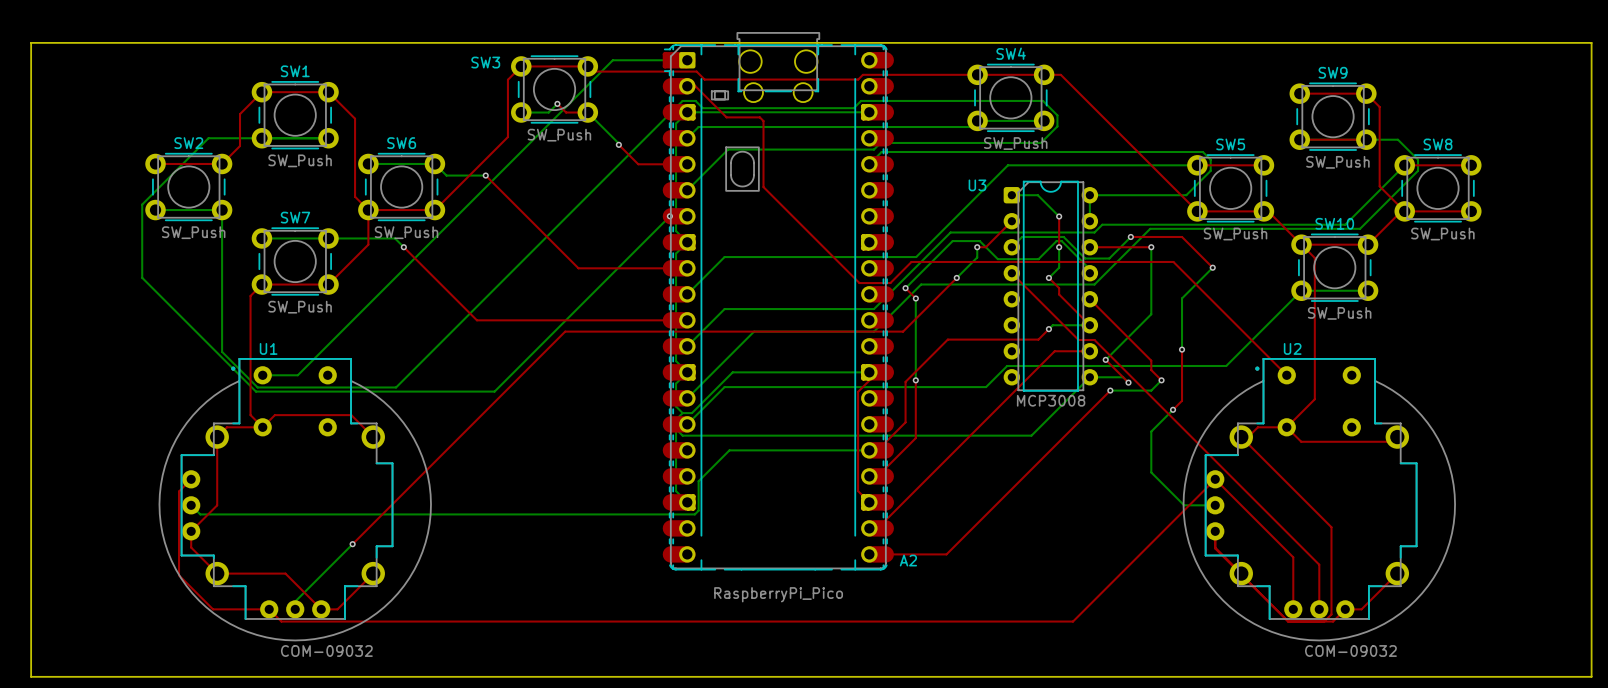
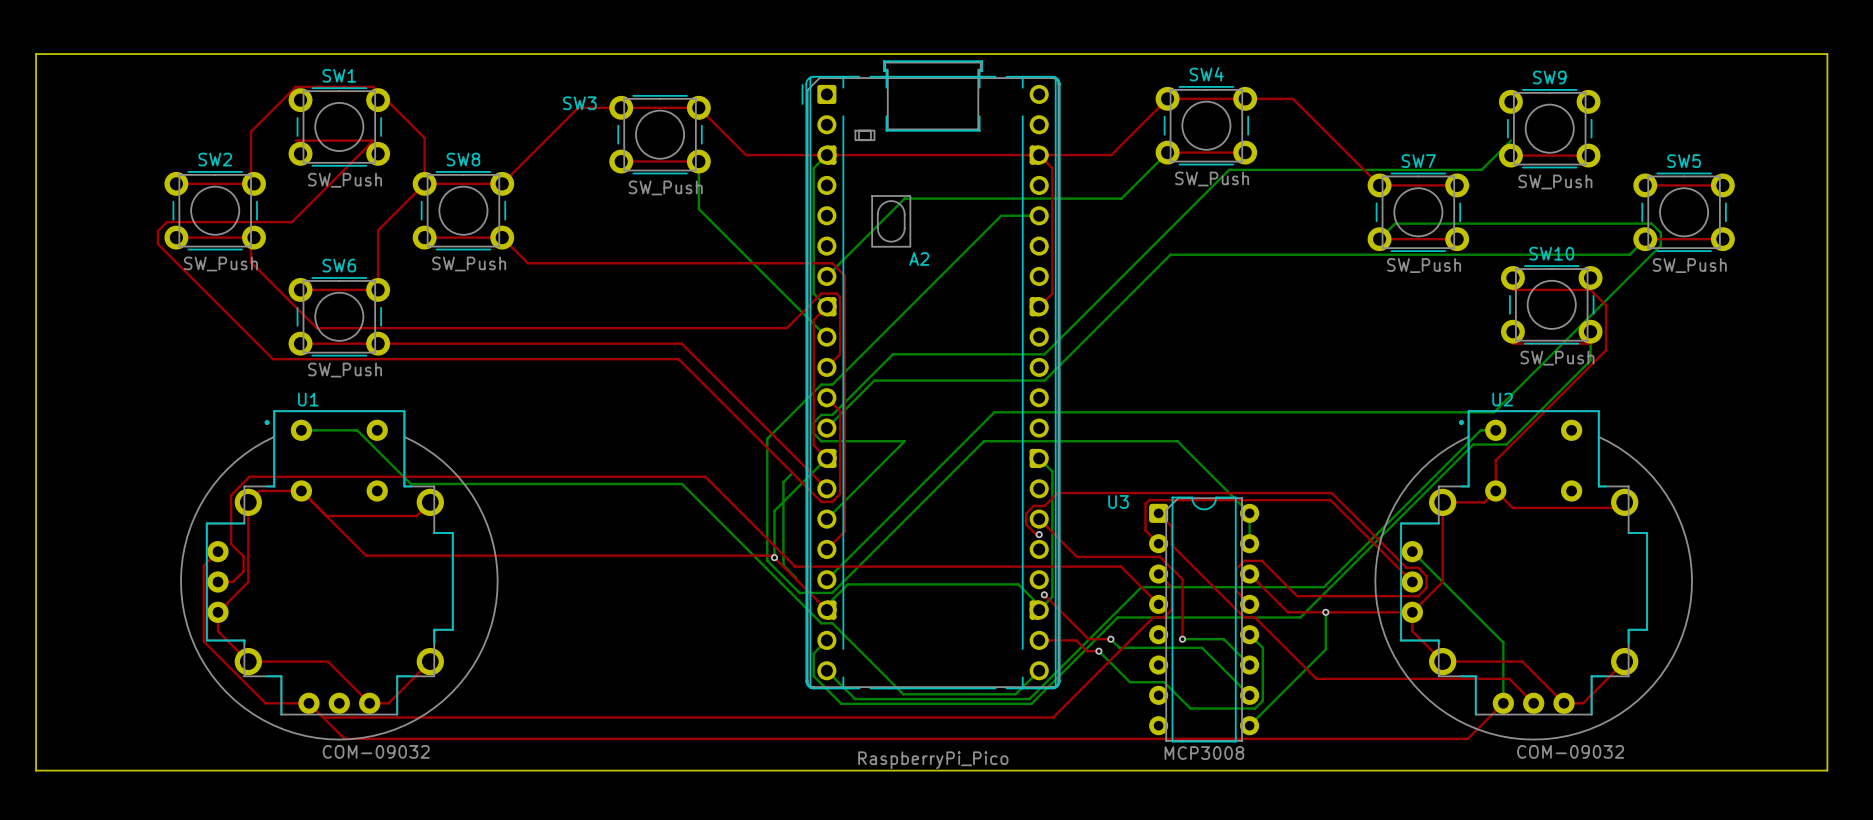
A2 footprint: [662, 32, 894, 571] -> [801, 60, 1061, 690]
board edge: (31, 42) (1591, 42) (1591, 676) (31, 676) (31, 42) -> (36, 54) (36, 770) (1827, 770) (1827, 54) (36, 54)
bottom track: (687, 60) (612, 60) (297, 375) -> (1039, 670) (1015, 694) (903, 694) (832, 623) (821, 623) (682, 483) (410, 483) (357, 430) (342, 430)
top track: (679, 86) (695, 86) (726, 117) (759, 117) (763, 121) (763, 187) (859, 283) (890, 283) (911, 261) (1173, 261) (1286, 375) -> none
SW3 position: (554, 89) -> (660, 134)
top track: (1299, 93) (1366, 93) (1379, 106) (1379, 186) (1404, 211) -> none
SW4 position: (1010, 97) -> (1206, 125)
top track: (557, 103) (566, 112) (587, 112) -> none
bottom track: (557, 103) (548, 112) (521, 112) -> none
via: (557, 103) -> none
bottom track: (587, 112) (618, 144) -> none
bottom track: (869, 112) (687, 112) (676, 123) (676, 231) (687, 242) (676, 253) (676, 361) (687, 372) (676, 383) (676, 406) (682, 413) (691, 413) (732, 372) (869, 372) -> none
bottom track: (1044, 120) (977, 120) (971, 127) (698, 127) (687, 138) -> none
top track: none -> (295, 140) (373, 140) (292, 222) (166, 222) (157, 231) (157, 244) (273, 359) (678, 359) (821, 501) (832, 501) (840, 494) (840, 410) (826, 397)
top track: none -> (1167, 152) (1245, 152)
bottom track: none -> (1167, 152) (1121, 198) (904, 198) (826, 276)
bottom track: (328, 138) (208, 138) (142, 204) (142, 277) (255, 391) (494, 391) (669, 216) -> none
bottom track: none -> (826, 155) (813, 168) (813, 293) (826, 306)
top track: none -> (1039, 155) (1052, 168) (1052, 293) (1039, 306)
bottom track: (1299, 139) (1397, 139) (1418, 159) (1418, 170) (1360, 228) (1150, 228) (1094, 284) (921, 284) (874, 331) (754, 331) (687, 398) -> none
SW6 name: SW6 (401, 143) -> SW8 (463, 159)
top track: none -> (621, 161) (698, 161)
bottom track: none -> (698, 161) (698, 209) (826, 337)
top track: (618, 144) (638, 164) (687, 164) -> none
via: (618, 144) -> none
bottom track: (1058, 151) (881, 151) (869, 164) -> (1229, 169) (1044, 354) (892, 354) (832, 414) (821, 414) (813, 422) (813, 433) (821, 441) (904, 441) (826, 519)
bottom track: (1202, 151) (1210, 159) (1210, 170) (1186, 195) (1089, 195) (1089, 221) -> (1397, 169) (1481, 169) (1510, 140)
top track: (219, 163) (222, 163) (240, 146) (240, 114) (261, 92) (328, 92) (355, 118) (355, 196) (368, 210) (368, 244) (328, 284) (261, 284) (250, 295) (250, 415) (262, 427) (274, 415) -> (251, 183) (251, 131) (295, 86) (373, 86) (424, 138) (424, 183)
top track: none -> (424, 183) (502, 183) (578, 107) (698, 107) (746, 155) (1111, 155) (1167, 98) (1292, 98) (1379, 185) (1391, 185)
top track: none -> (424, 183) (378, 230) (378, 289) (300, 289)
bottom track: (368, 163) (434, 163) (446, 175) (485, 175) -> none
bottom track: (1197, 165) (1007, 165) (916, 257) (724, 257) (687, 294) -> none
bottom track: (1404, 165) (1345, 224) -> (1645, 239) (1629, 254) (1564, 254)
top track: (485, 175) (578, 268) (679, 268) -> none
via: (485, 175) -> none
SW5 position: (1230, 188) -> (1684, 212)
SW8: SW_Push (1438, 188) -> none
bottom track: (687, 190) (728, 149) (874, 149) (880, 142) (1040, 142) (1057, 126) (1057, 115) (1043, 100) (861, 100) (853, 108) (702, 108) (695, 100) (682, 100) (396, 387) (257, 387) (222, 351) (222, 210) (155, 210) -> none
bottom track: none -> (1039, 215) (1001, 215) (832, 384) (821, 384) (767, 438) (767, 560) (799, 592) (832, 592) (983, 441) (1177, 441) (1249, 513) (1249, 543)
bottom track: (1011, 195) (1037, 195) (1059, 216) -> none
top track: none -> (173, 237) (251, 237) (251, 262) (316, 328) (786, 328) (821, 293) (836, 293) (840, 297) (840, 354) (826, 367)
top track: (434, 210) (507, 137) (507, 79) (521, 66) (587, 66) (592, 71) (696, 71) (704, 79) (858, 79) (862, 74) (1060, 74) (1197, 211) -> (502, 237) (527, 263) (832, 263) (844, 275) (844, 531) (826, 549)
bottom track: none -> (1379, 239) (1395, 223) (1651, 223) (1660, 232) (1660, 245) (1494, 412) (994, 412) (826, 579)
top track: (1253, 211) (1268, 211) (1314, 257) (1314, 399) (1286, 427) (1257, 427) (1248, 437) -> (1512, 289) (1590, 289) (1606, 305) (1606, 350) (1495, 460) (1495, 490) (1484, 502) (1450, 502)
top track: (1414, 211) (1401, 211) (1368, 244) (1301, 244) -> none
via: (669, 216) -> none
top track: (1059, 216) (1059, 247) -> none
via: (1059, 216) -> none
top track: (1011, 221) (985, 247) (977, 247) -> none
bottom track: (1102, 224) (1094, 232) (950, 232) (874, 309) (724, 309) (687, 346) -> (1280, 254) (1170, 254) (1044, 380) (874, 380) (826, 428)
top track: (1130, 236) (1182, 236) (1212, 267) -> none
bottom track: (1130, 236) (1109, 258) (1085, 258) (1063, 236) (1022, 236) (1011, 247) -> none
via: (1130, 236) -> none
bottom track: (261, 238) (395, 238) (403, 247) -> none
top track: (403, 247) (476, 320) (679, 320) -> none
via: (403, 247) -> none
bottom track: (977, 247) (977, 257) (956, 277) -> none
via: (977, 247) -> none
bottom track: (1059, 247) (1059, 267) (1048, 277) -> none
via: (1059, 247) -> none
top track: (1089, 247) (1151, 247) -> none
bottom track: (1151, 247) (1151, 314) (1105, 359) -> none
via: (1151, 247) -> none
SW7 position: (295, 261) -> (1418, 212)
bottom track: (1212, 267) (1182, 298) (1182, 349) -> none
via: (1212, 267) -> none
top track: none -> (826, 306) (813, 319) (813, 445) (826, 458)
top track: (1011, 273) (1078, 339) (1094, 339) (1319, 564) (1319, 609) -> (1158, 513) (1171, 526) (1171, 545) (1244, 617) (1255, 617) (1316, 678) (1509, 678) (1533, 703)
bottom track: (1089, 273) (1089, 269) (1061, 241) (1056, 241) (1038, 259) (997, 259) (979, 241) (952, 241) (905, 288) -> none
SW6: none -> SW_Push (339, 316)
top track: (956, 277) (903, 331) (565, 331) (352, 544) -> none
via: (956, 277) -> none
top track: (1048, 277) (1059, 288) (1059, 294) (1089, 325) -> none
via: (1048, 277) -> none
U3 position: (1050, 286) -> (1204, 619)
top track: (905, 288) (915, 298) -> none
via: (905, 288) -> none
bottom track: (1368, 290) (1301, 290) (1226, 365) (1007, 365) (986, 387) (724, 387) (687, 424) -> none
bottom track: (915, 298) (915, 380) -> none
via: (915, 298) -> none
top track: (1089, 299) (1151, 360) (1151, 370) (1161, 380) -> none
top track: none -> (300, 343) (681, 343) (826, 488)
top track: none -> (1512, 343) (1590, 343)
bottom track: none -> (1590, 343) (1590, 360) (1506, 444) (1473, 444) (1300, 617) (1117, 617) (1031, 703) (841, 703) (813, 676) (813, 653) (826, 640)
bottom track: (1089, 325) (1052, 325) (1048, 329) -> none
top track: (1048, 329) (1038, 339) (947, 339) (905, 381) (905, 422) (877, 450) -> none
via: (1048, 329) -> none
top track: (1182, 349) (1182, 400) (1173, 409) -> none
via: (1182, 349) -> none
top track: (1089, 351) (1054, 351) (877, 528) -> none
top track: (1105, 359) (1128, 382) -> none
via: (1105, 359) -> none
top track: (877, 372) (858, 391) (858, 491) (869, 502) -> none
bottom track: none -> (1495, 430) (1480, 430) (1323, 587) (1141, 587) (1029, 699) (855, 699) (826, 670)
top track: (915, 380) (915, 438) (877, 476) -> none
via: (915, 380) -> none
bottom track: (1161, 380) (1151, 390) (1110, 390) -> none
via: (1161, 380) -> none
bottom track: (1128, 382) (1123, 377) (1089, 377) (1031, 435) (682, 435) (676, 429) -> none
via: (1128, 382) -> none
top track: (1110, 390) (946, 554) -> (1110, 639) (1098, 639)
via: (1110, 390) -> none
bottom track: none -> (826, 458) (774, 510) (774, 557)
bottom track: none -> (1039, 458) (1052, 471) (1052, 596) (1039, 610) (1039, 605) (1018, 584) (847, 584) (826, 605) (826, 610)
bottom track: (1173, 409) (1151, 431) (1151, 472) (1184, 505) (1215, 505) -> none
via: (1173, 409) -> none
top track: none -> (315, 476) (249, 476) (231, 495) (231, 543) (243, 556) (243, 571) (233, 581) (217, 581)
top track: (351, 415) (373, 437) -> (326, 516) (416, 516) (430, 502)
top track: none -> (404, 476) (705, 476) (795, 566) (1120, 566) (1158, 604)
top track: none -> (301, 490) (366, 555) (772, 555) (826, 610)
top track: none -> (1442, 502) (1442, 581) (1412, 612) (1287, 612) (1249, 574)
top track: (1245, 441) (1331, 527) (1331, 614) (1324, 621) -> none
bottom track: (869, 450) (729, 450) (698, 481) (698, 510) (694, 514) (200, 514) (191, 505) -> none
top track: none -> (1039, 519) (1076, 556) (1160, 556) (1182, 579) (1182, 639)
top track: none -> (1039, 534) (1036, 534) (1026, 524) (1026, 513) (1033, 505) (1044, 505) (1057, 493) (1331, 493) (1406, 567) (1418, 567) (1426, 576) (1426, 587) (1418, 596) (1297, 596) (1261, 560) (1244, 560) (1236, 568) (1236, 591) (1249, 604)
via: none -> (1039, 534)
top track: none -> (1158, 543) (1145, 530) (1145, 503) (1149, 500) (1330, 500) (1412, 581)
bottom track: none -> (1412, 551) (1503, 642) (1503, 703)
via: none -> (774, 557)
via: none -> (1044, 594)
bottom track: none -> (1325, 612) (1325, 649) (1249, 725)
via: none -> (1325, 612)
bottom track: (352, 544) (295, 601) (295, 609) -> none
via: (352, 544) -> none
top track: (1215, 547) (1288, 621) (1333, 621) (1345, 609) -> (1442, 661) (1522, 661) (1564, 703)
bottom track: none -> (1249, 634) (1262, 647) (1262, 700) (1255, 708) (1190, 708) (1164, 682) (1129, 682) (1098, 651)
top track: (877, 554) (937, 554) -> (1044, 594) (1088, 639)
bottom track: none -> (1110, 639) (1119, 647) (1202, 647) (1249, 695)
via: none -> (1110, 639)
bottom track: none -> (1182, 639) (1223, 639) (1249, 665)
via: none -> (1182, 639)
top track: none -> (1039, 640) (1076, 640) (1086, 651) (1098, 651)
top track: (179, 556) (179, 575) (213, 609) (232, 609) -> (203, 641) (265, 703)
A2 name position: A2 (908, 560) -> A2 (919, 258)
via: none -> (1098, 651)
A2 value position: RaspberryPi_Pico (778, 594) -> RaspberryPi_Pico (933, 760)
top track: (1293, 609) (1293, 557) (1215, 479) (1073, 621) (907, 621) -> (1158, 574) (1171, 587) (1171, 609) (1164, 617) (1153, 617) (1053, 717)
top track: none -> (1503, 703) (1467, 738) (344, 738) (323, 717)

